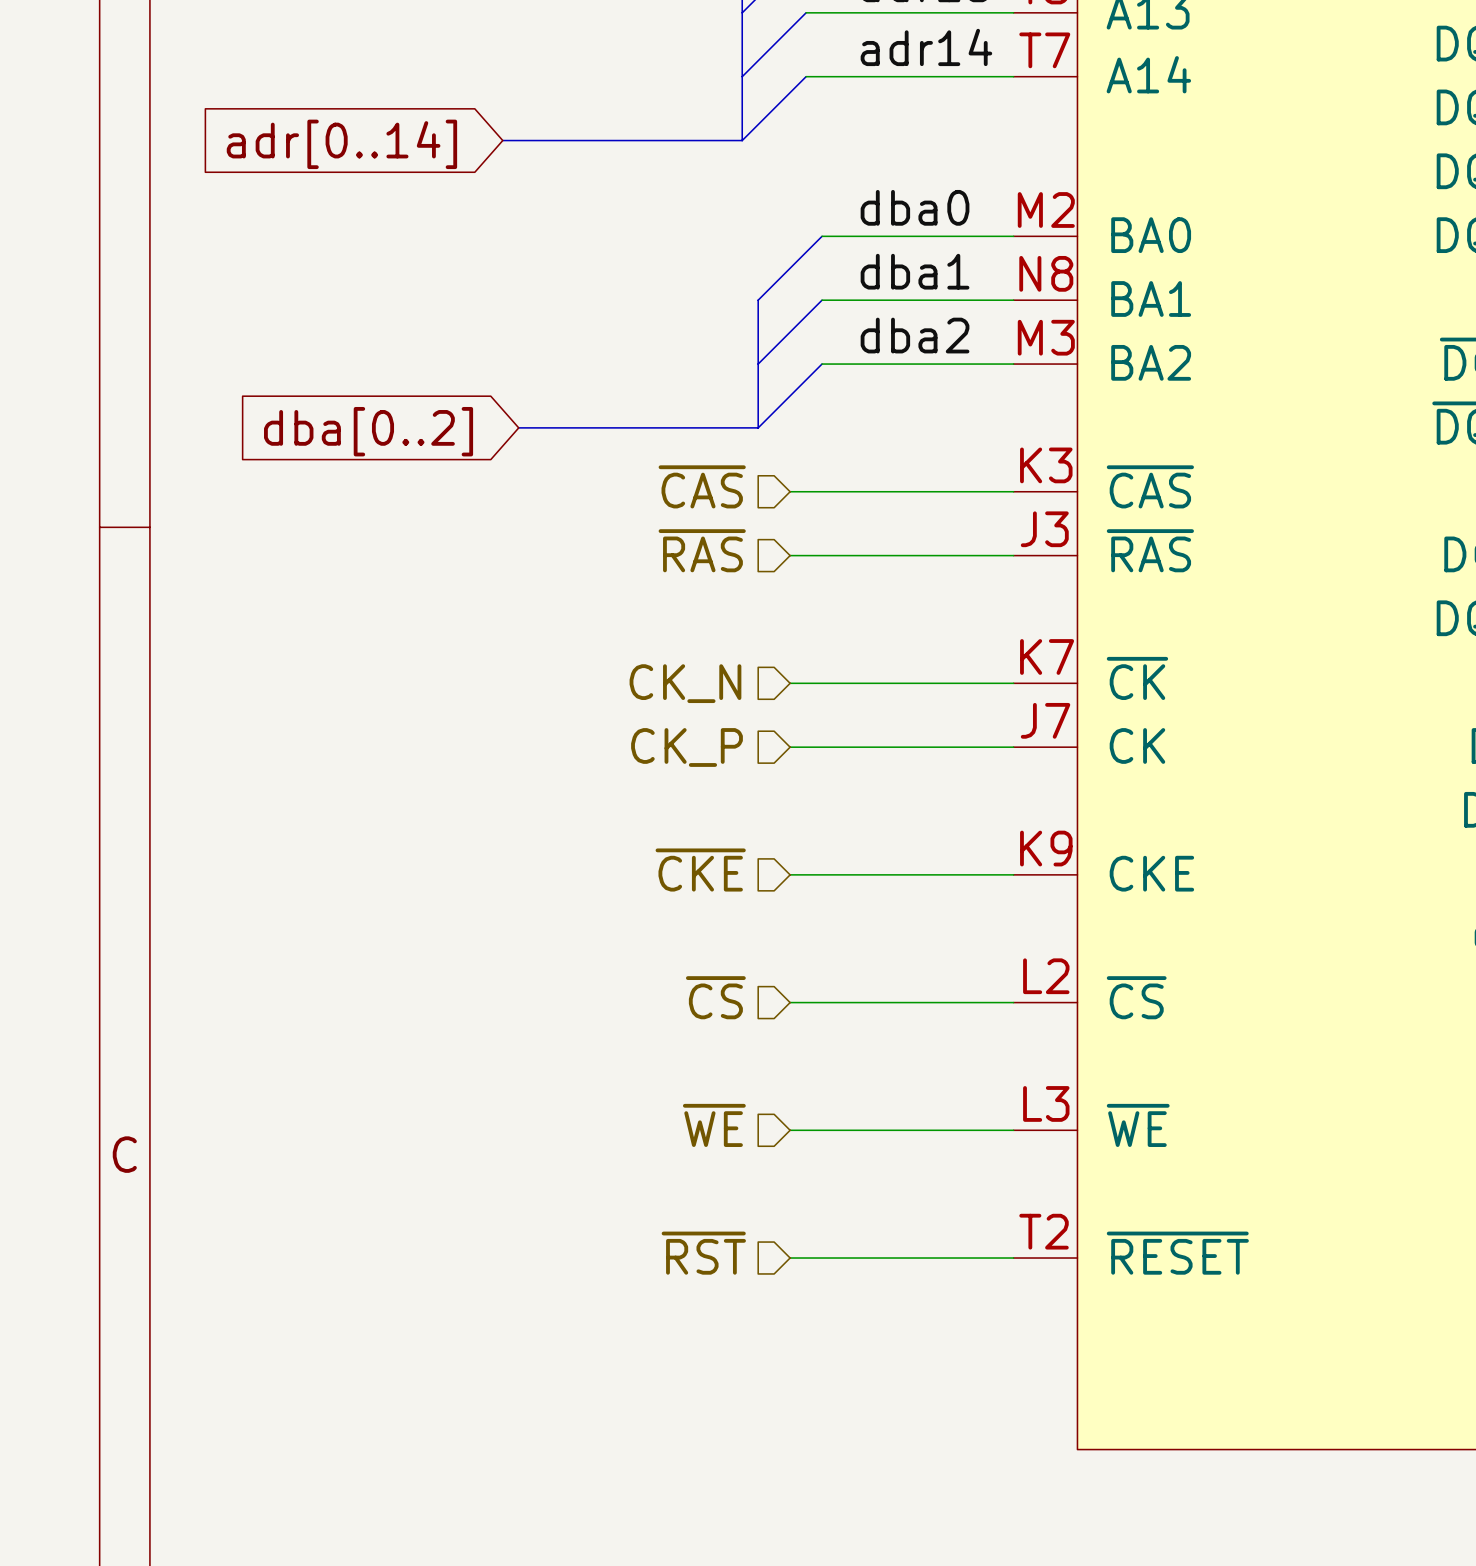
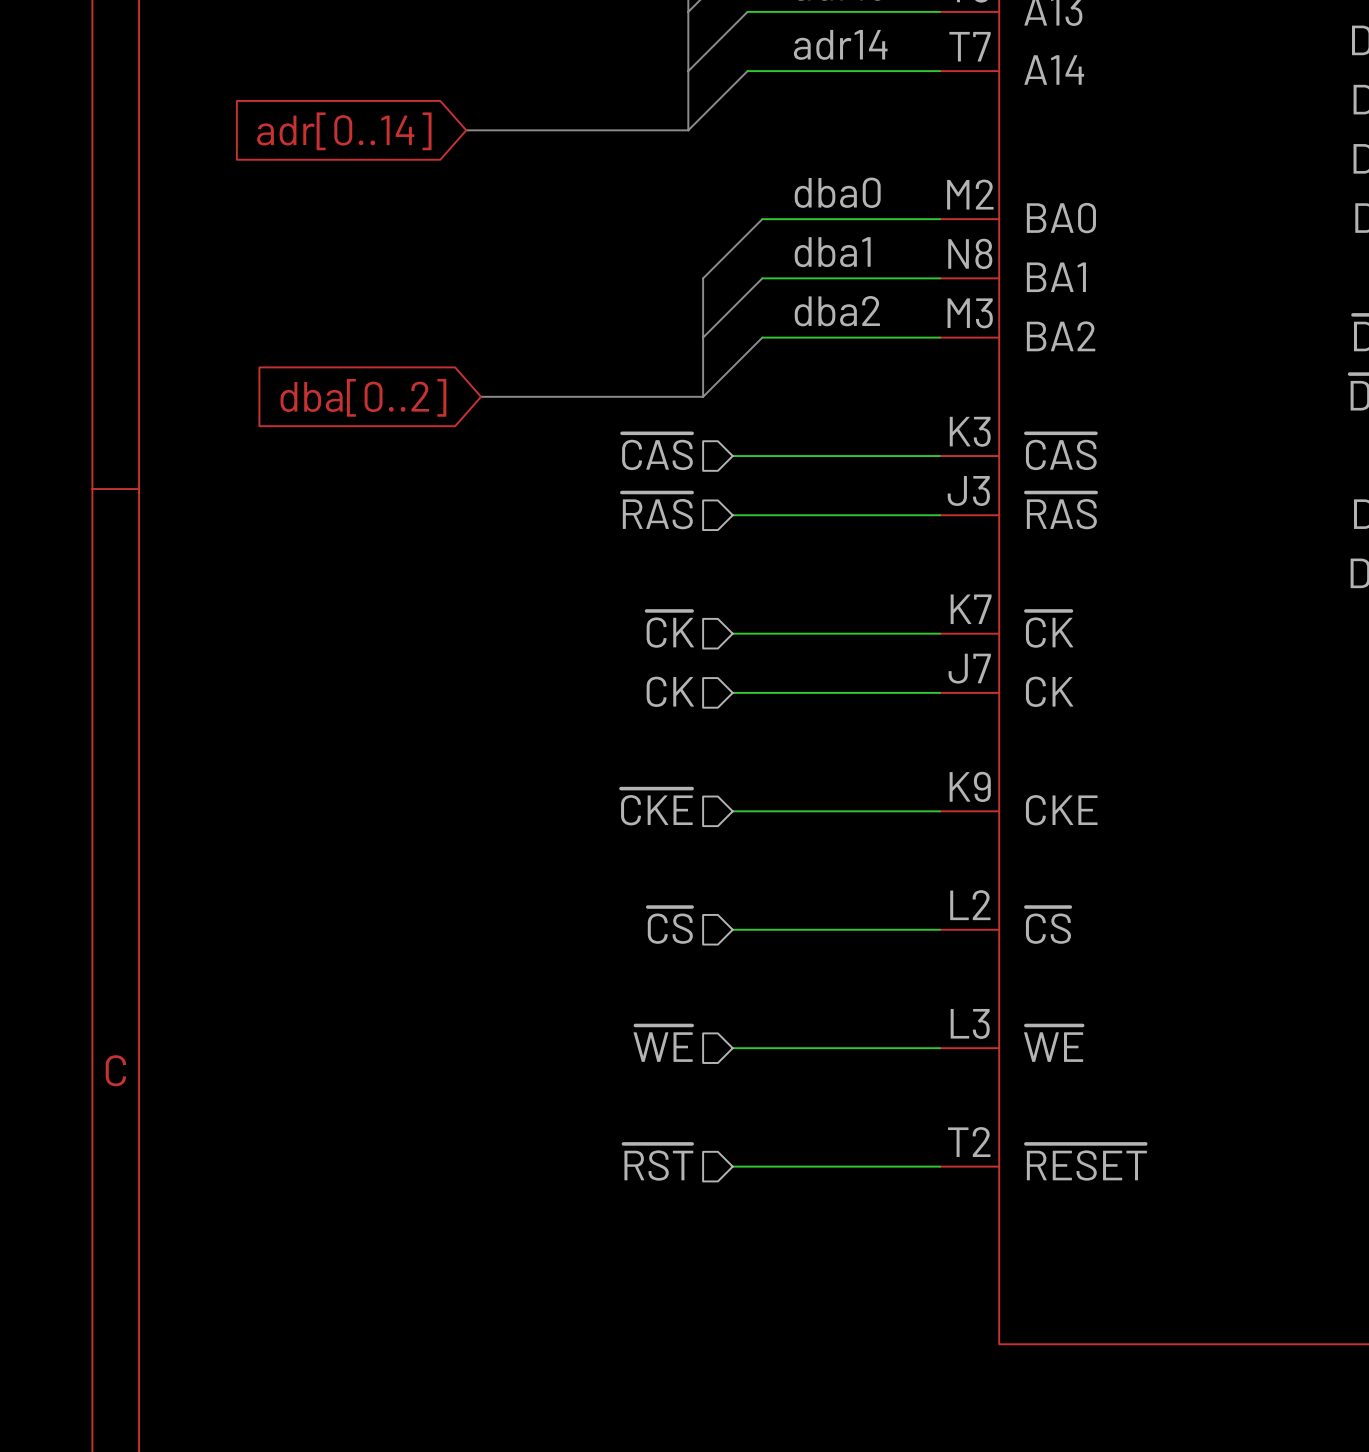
hierarchical label: CK_N (685, 683) -> ~{CK} (670, 629)
hierarchical label: CK_P (686, 747) -> CK (670, 691)

